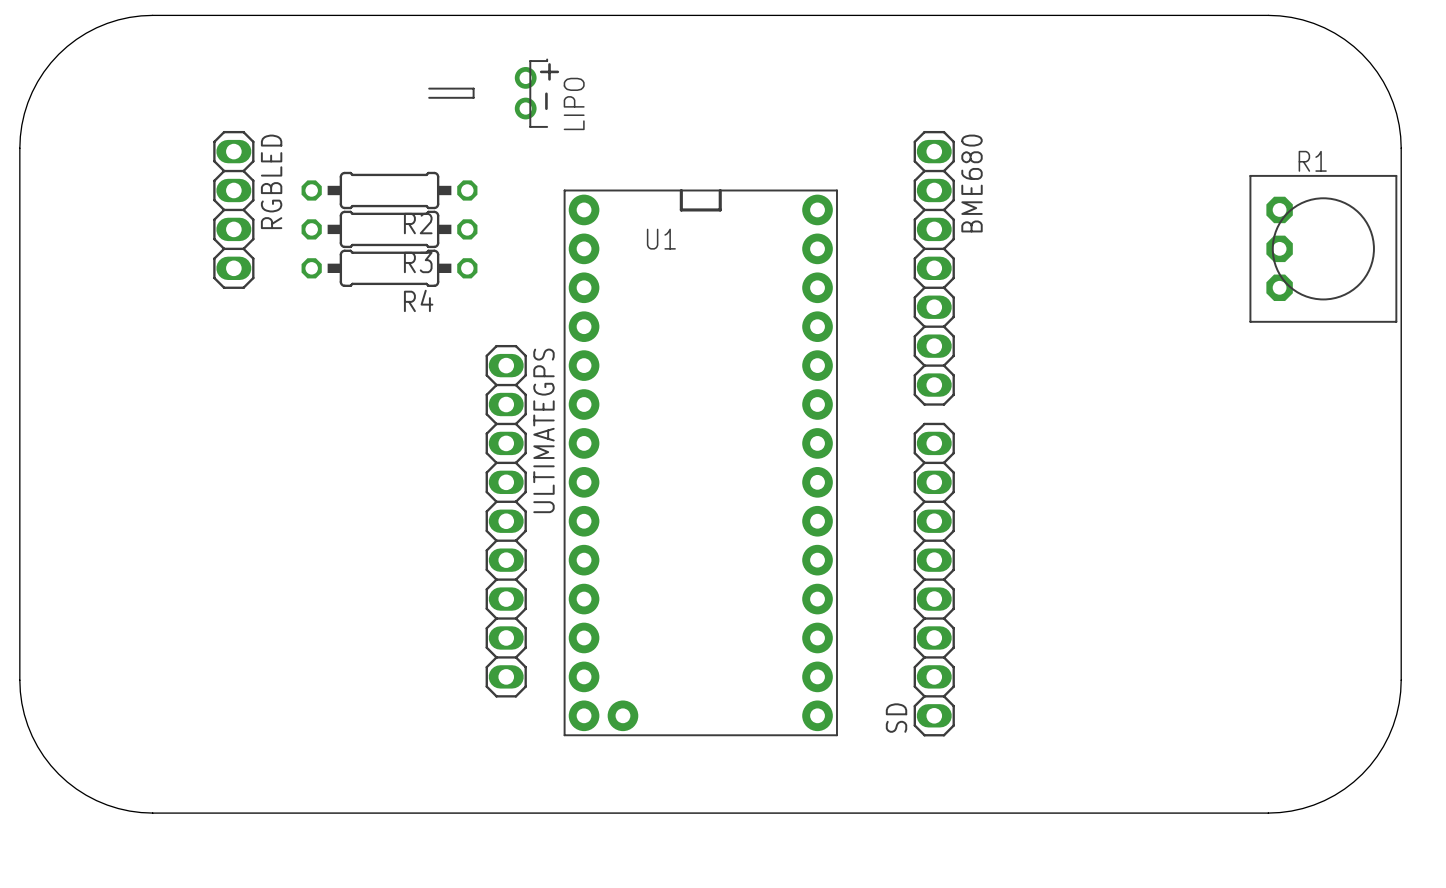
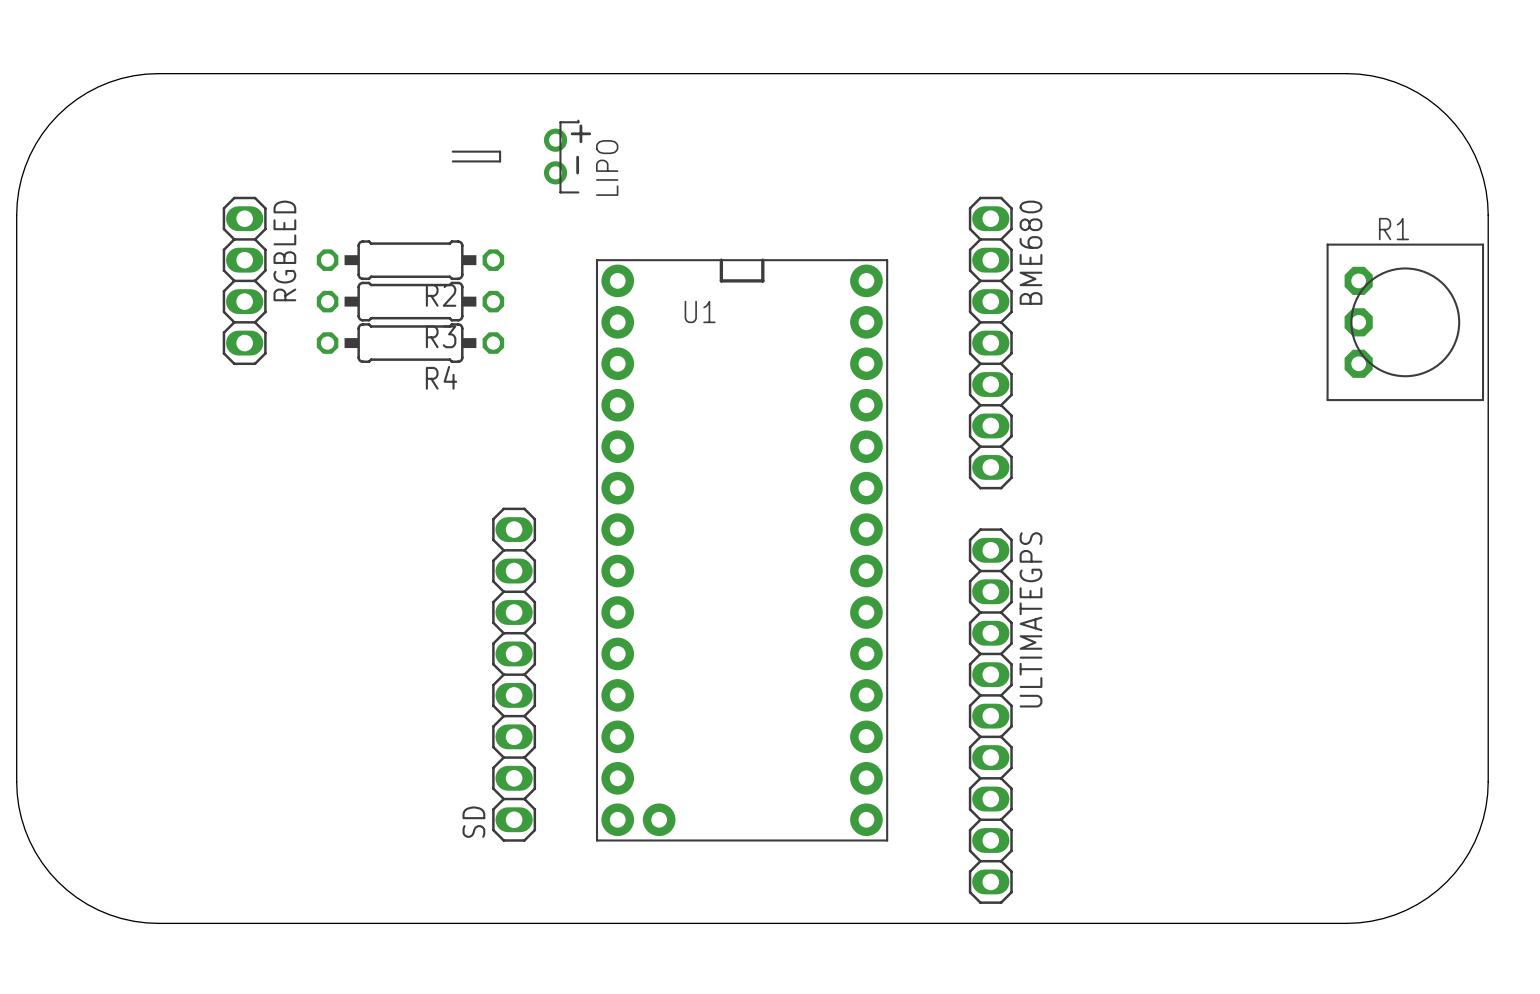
ULTIMATEGPS: (506, 521) -> none
SD: none -> (514, 674)
SD: (934, 579) -> none
ULTIMATEGPS: none -> (990, 716)

